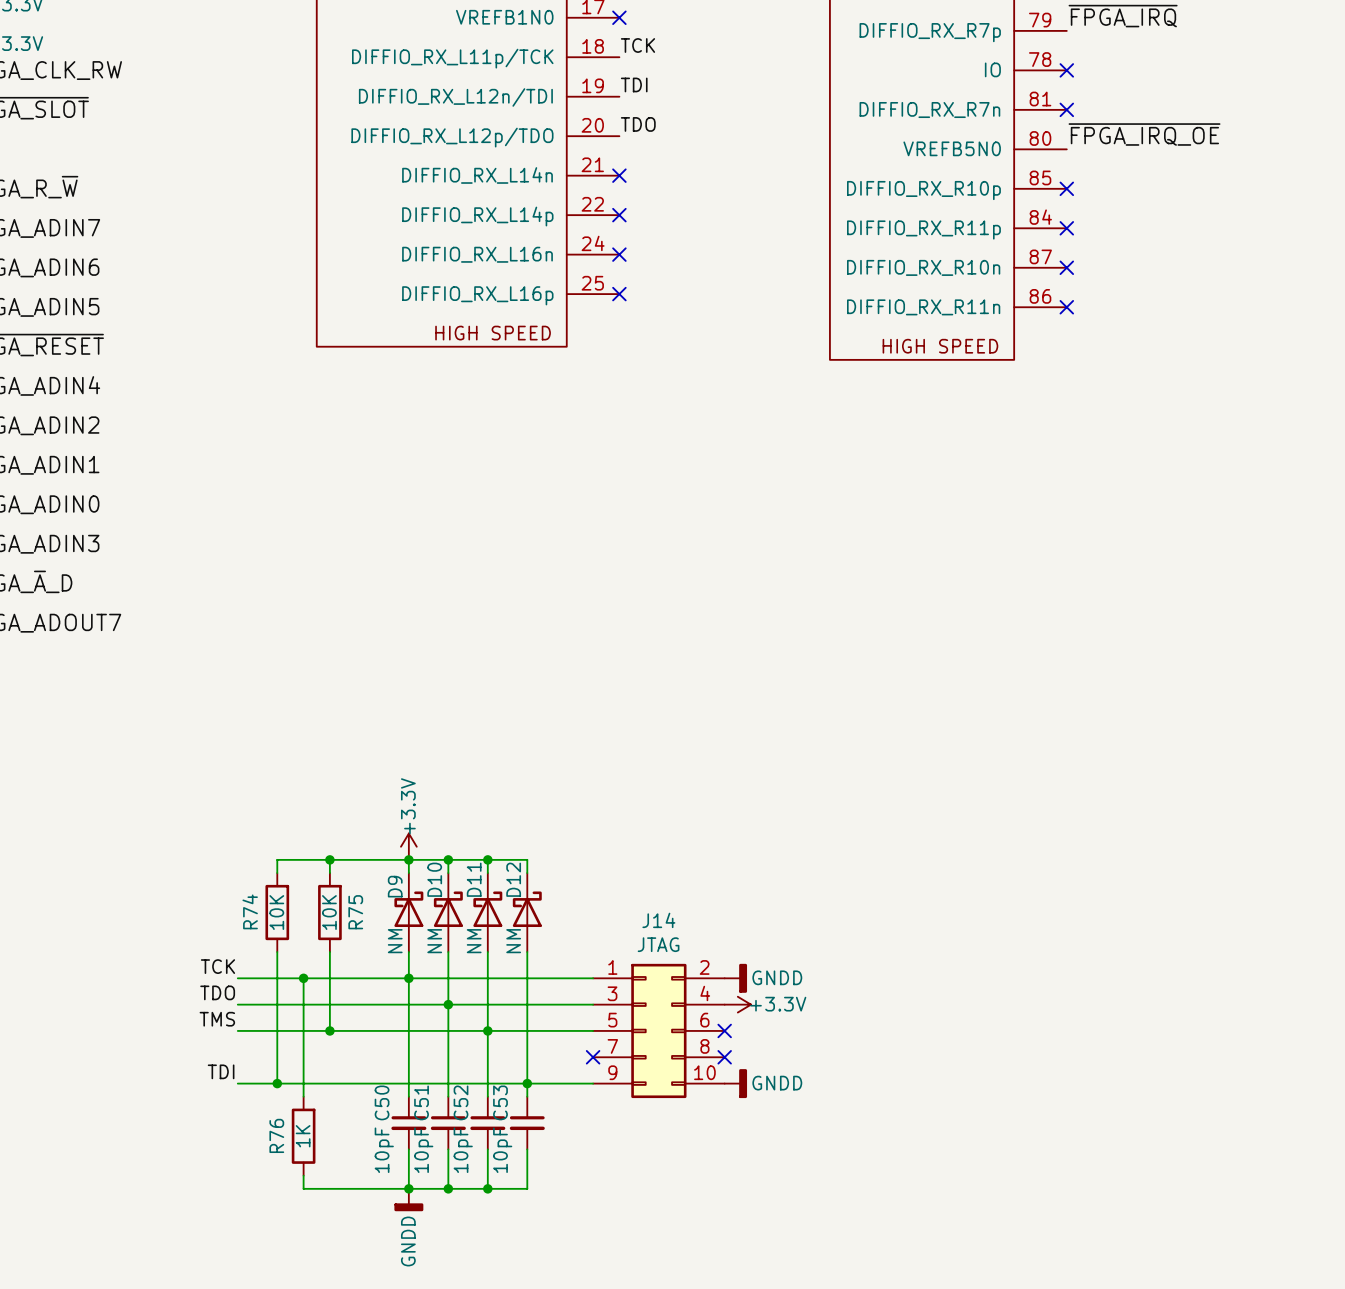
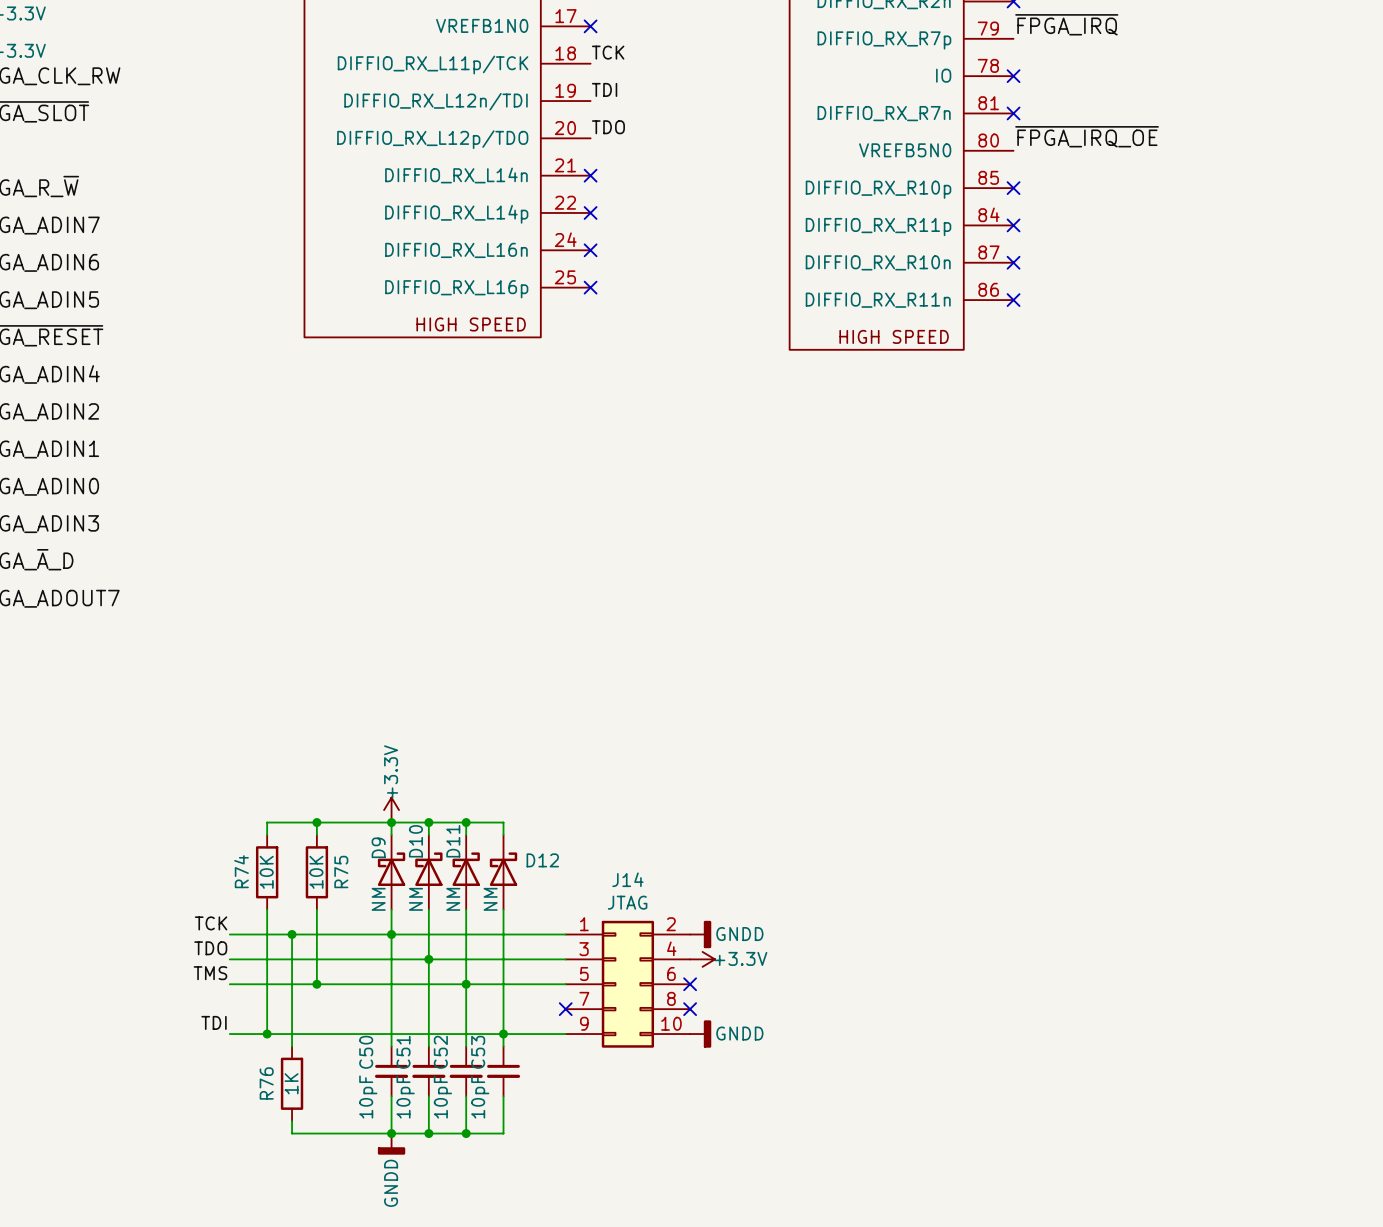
D12 name rotation: 0° (513, 879) -> 90° clockwise (542, 860)
D12 name position: D12 (513, 879) -> D12 (542, 860)

